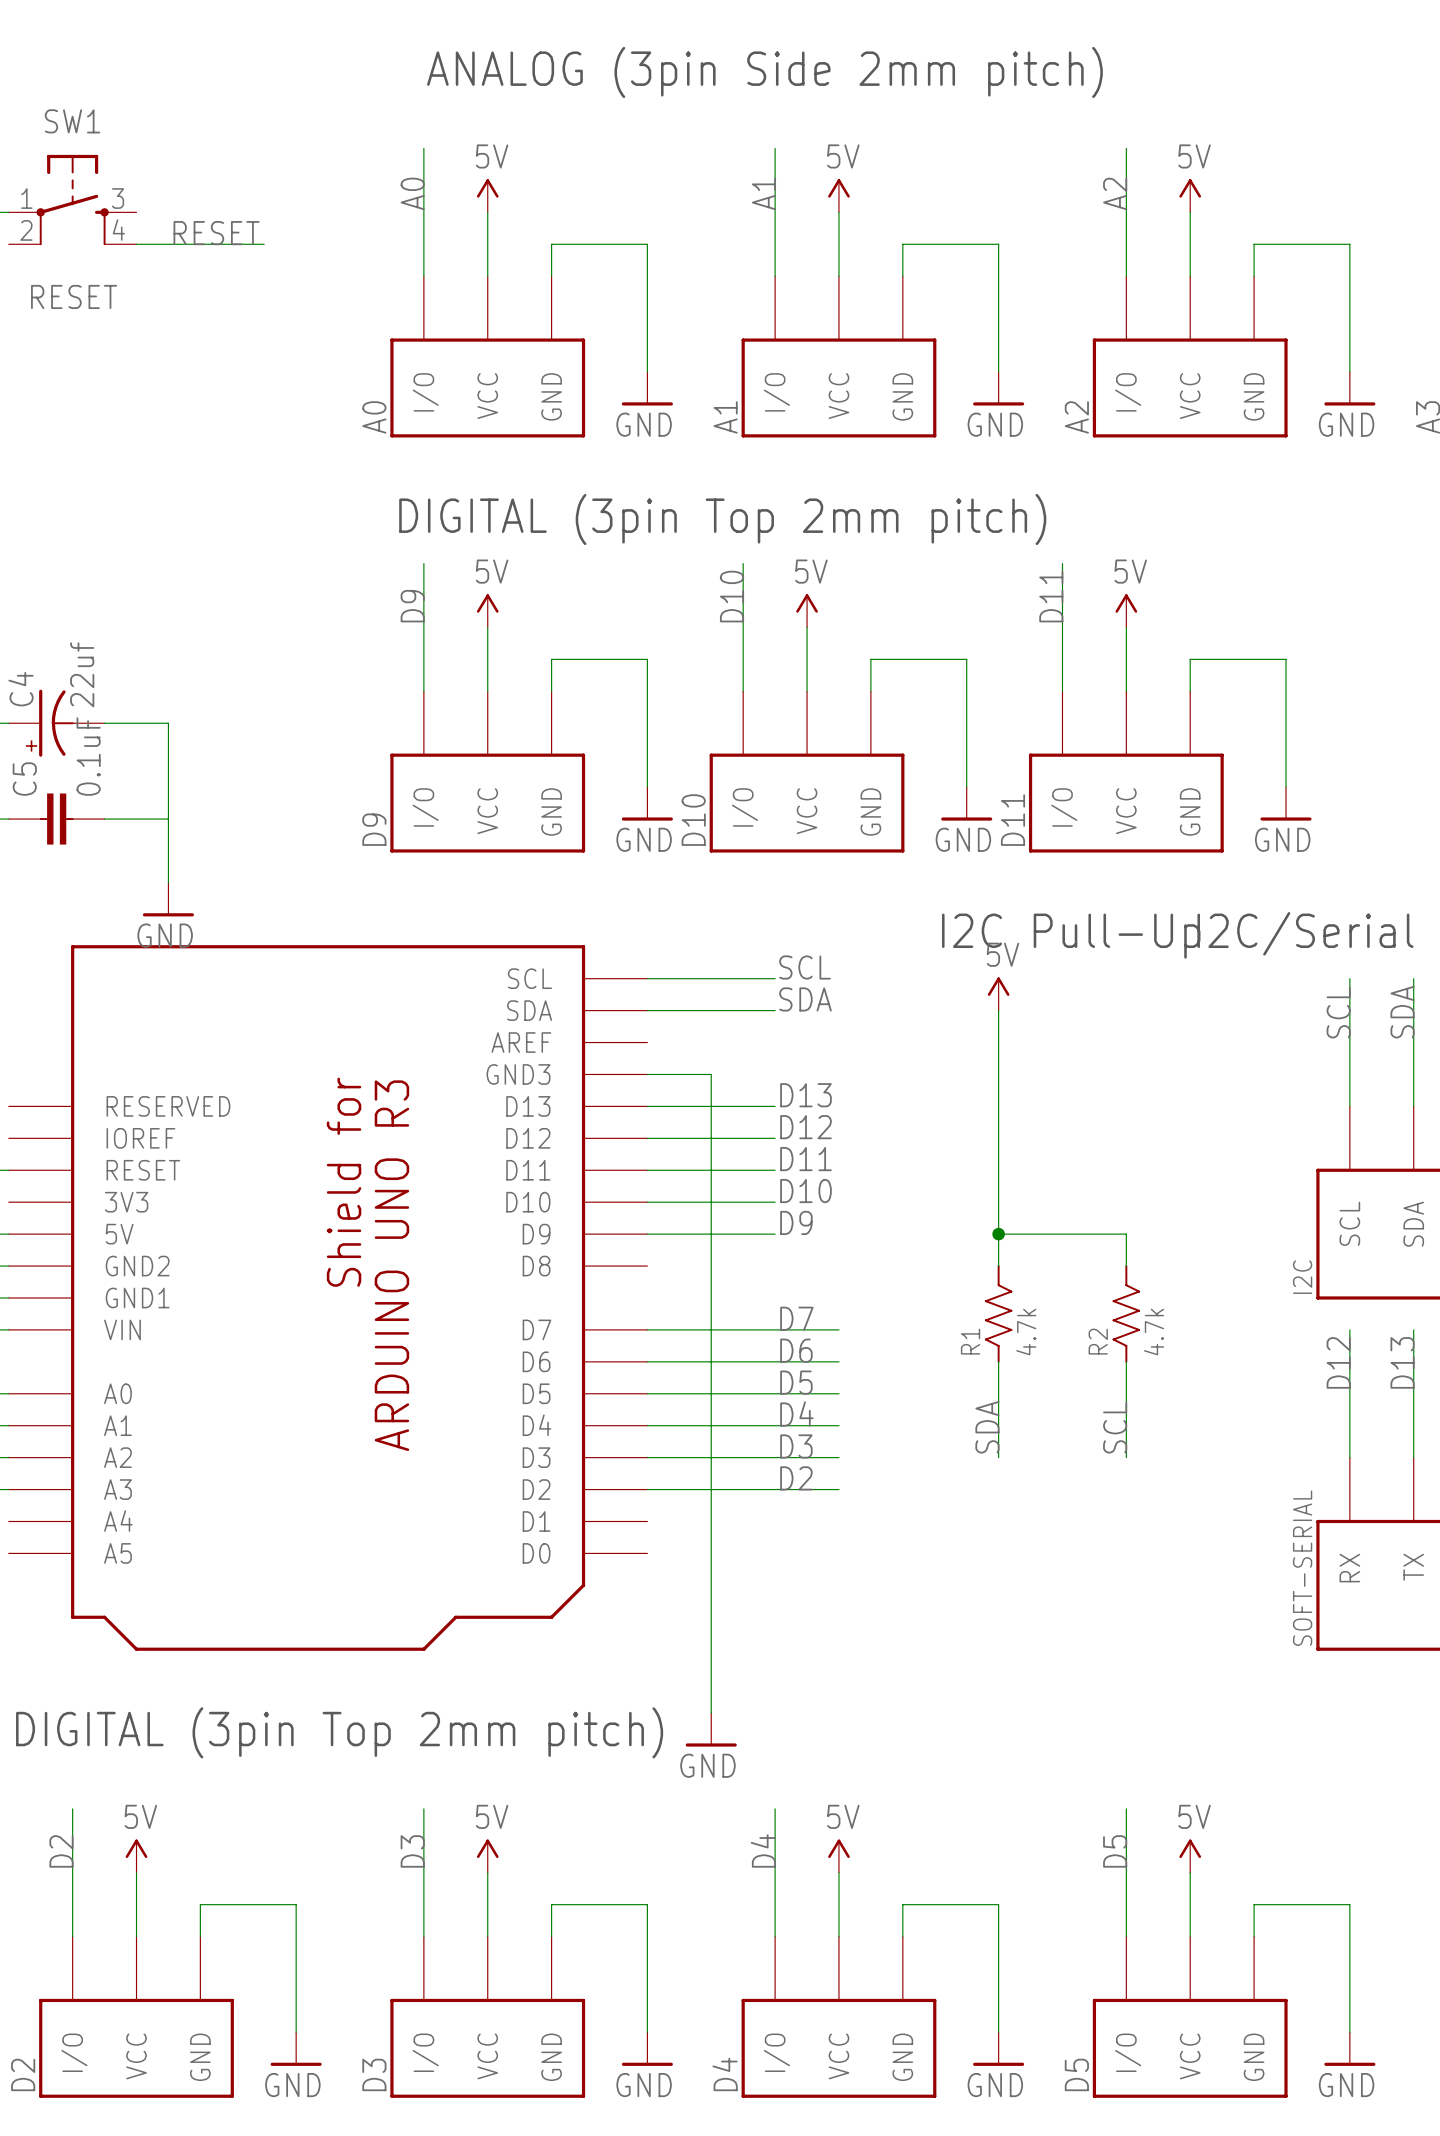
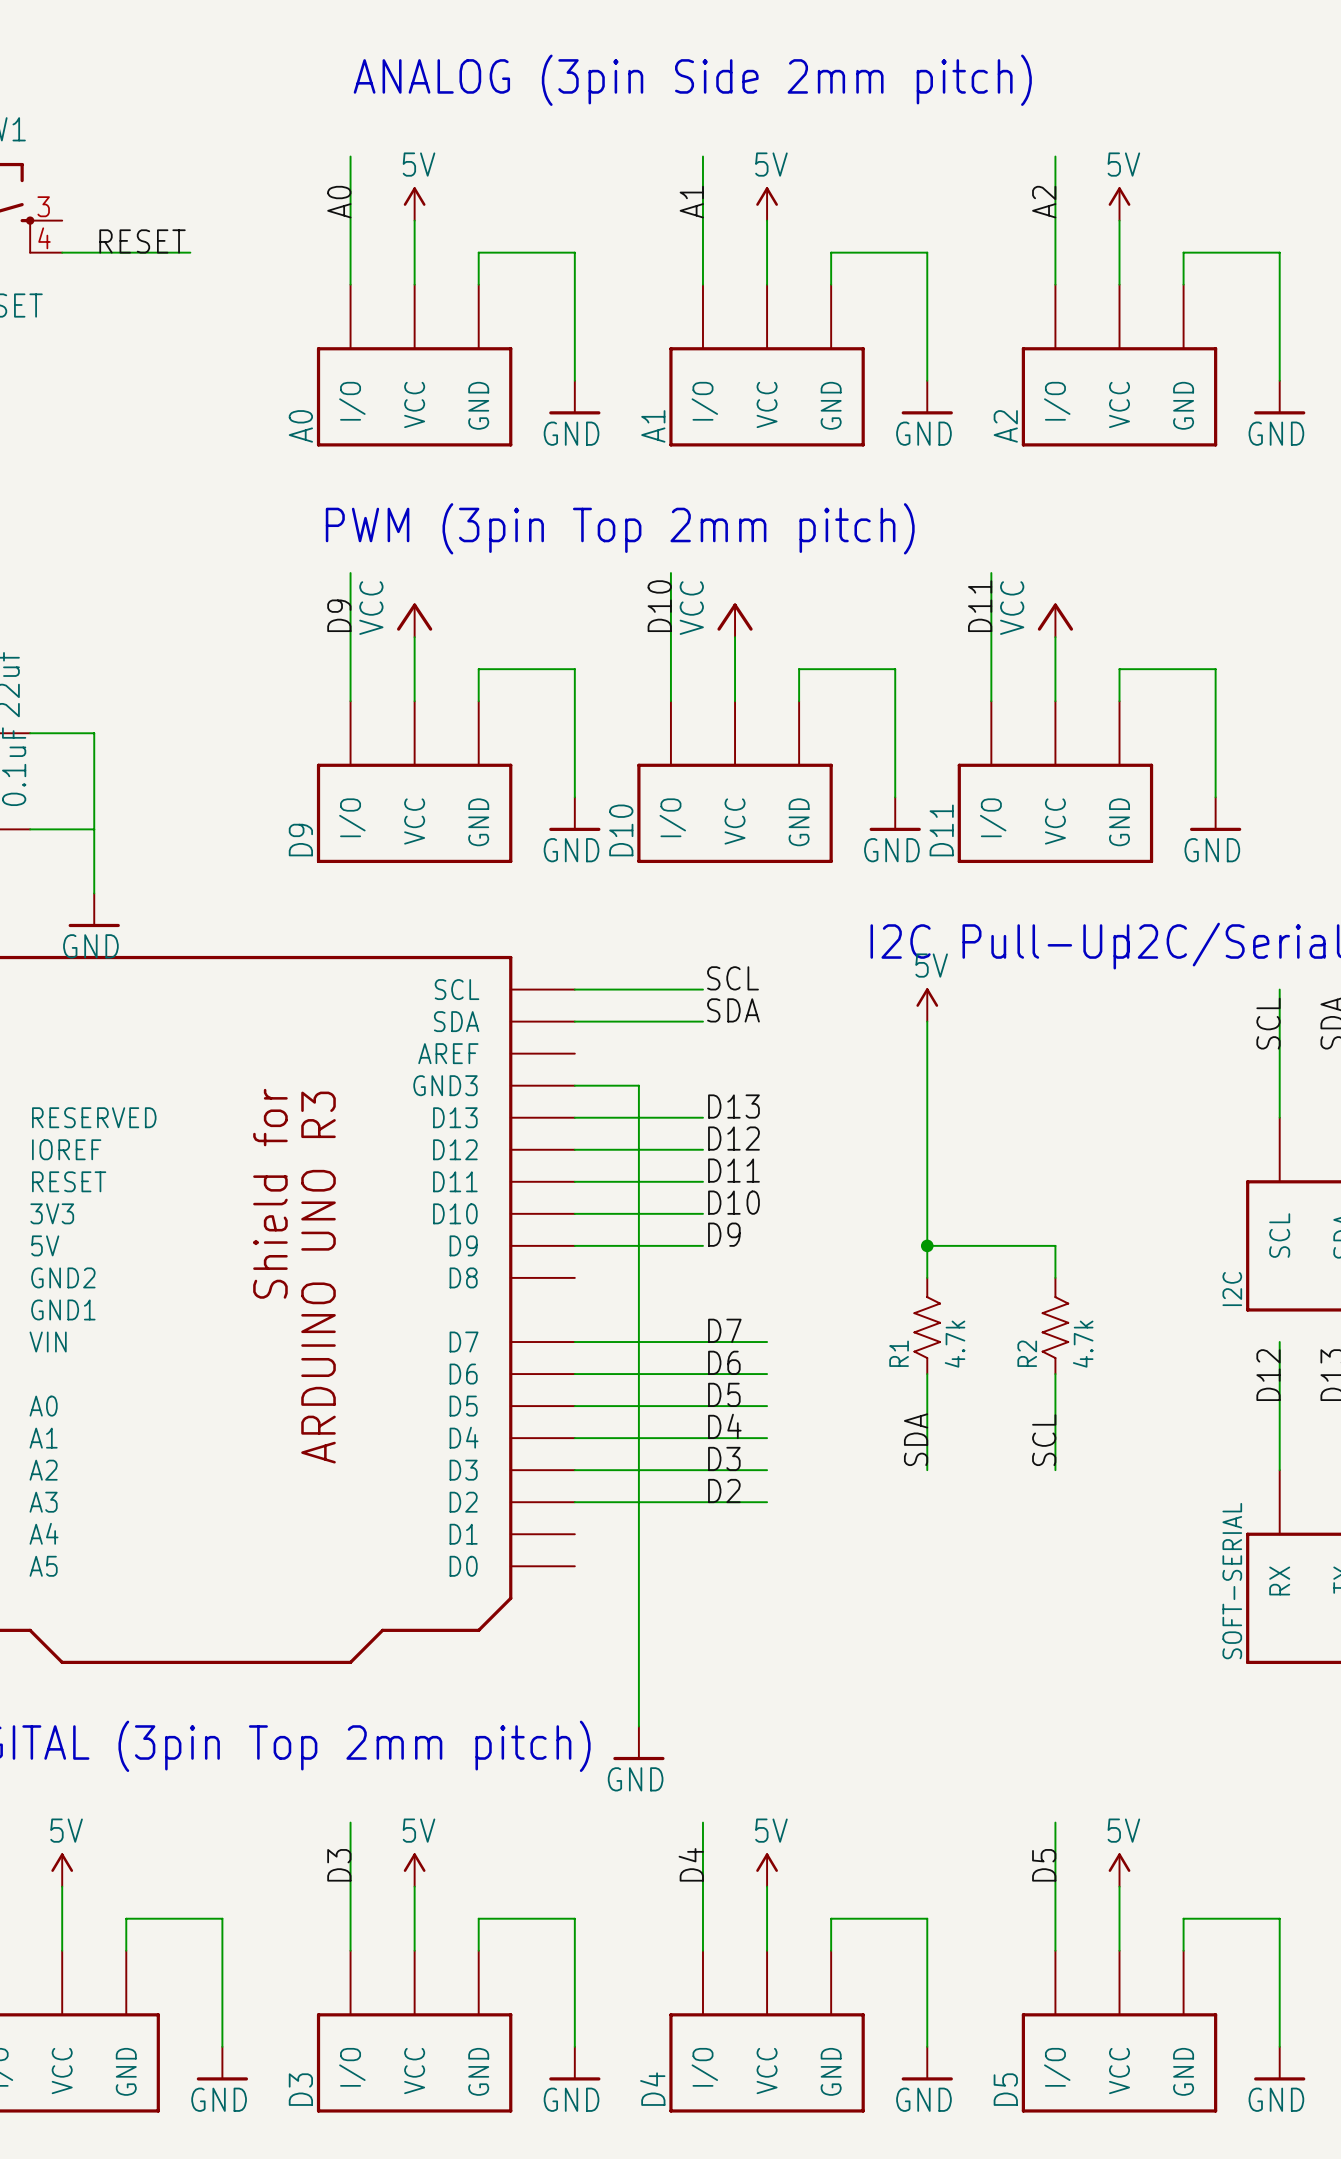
text: DIGITAL (3pin Top 2mm pitch) (722, 519) -> PWM (3pin Top 2mm pitch) (620, 528)
power symbol: 5V (487, 610) -> VCC (414, 620)
power symbol: 5V (807, 610) -> VCC (735, 620)
power symbol: 5V (1126, 610) -> VCC (1055, 620)

